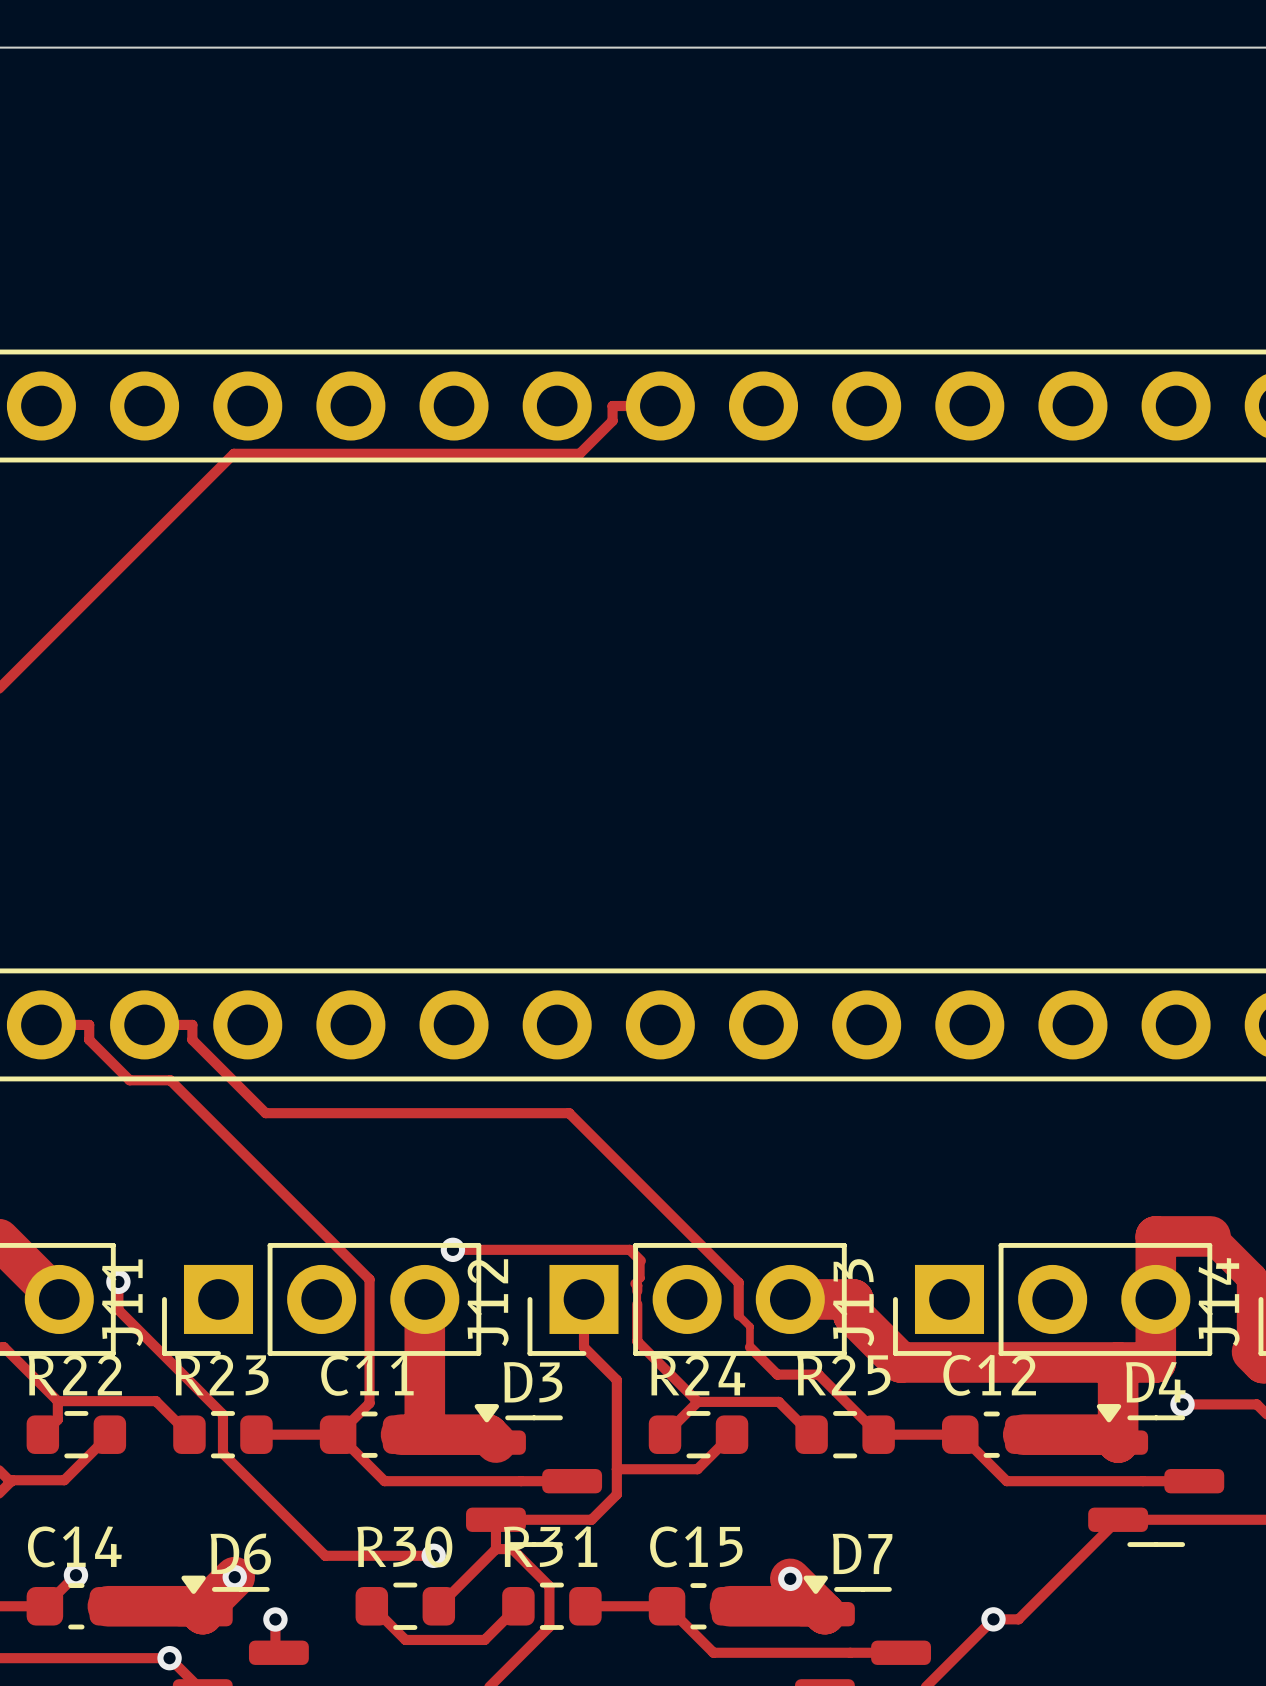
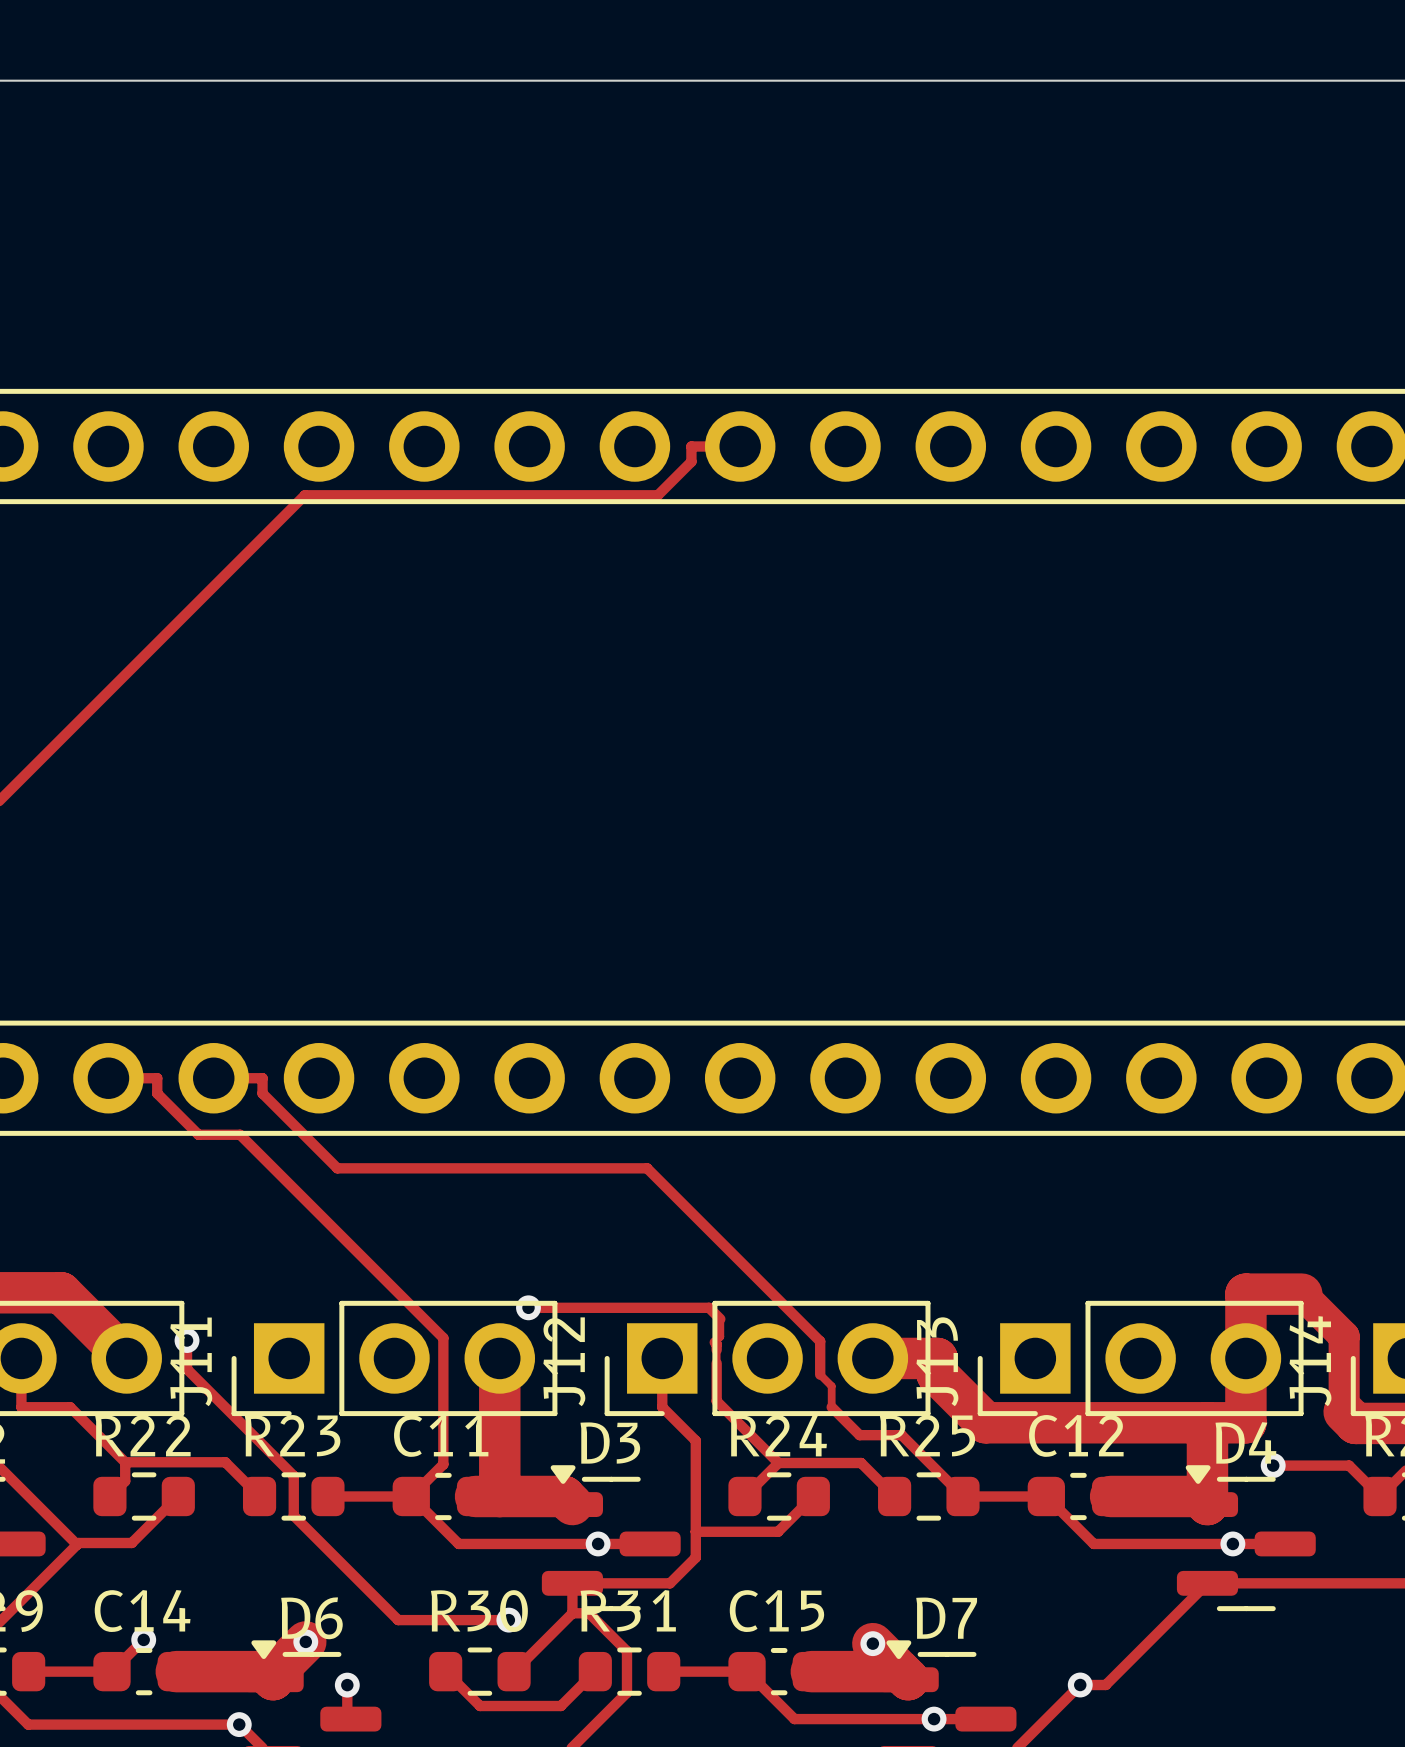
via: none -> (598, 1543)
via: none -> (1232, 1543)
via: none -> (934, 1719)

